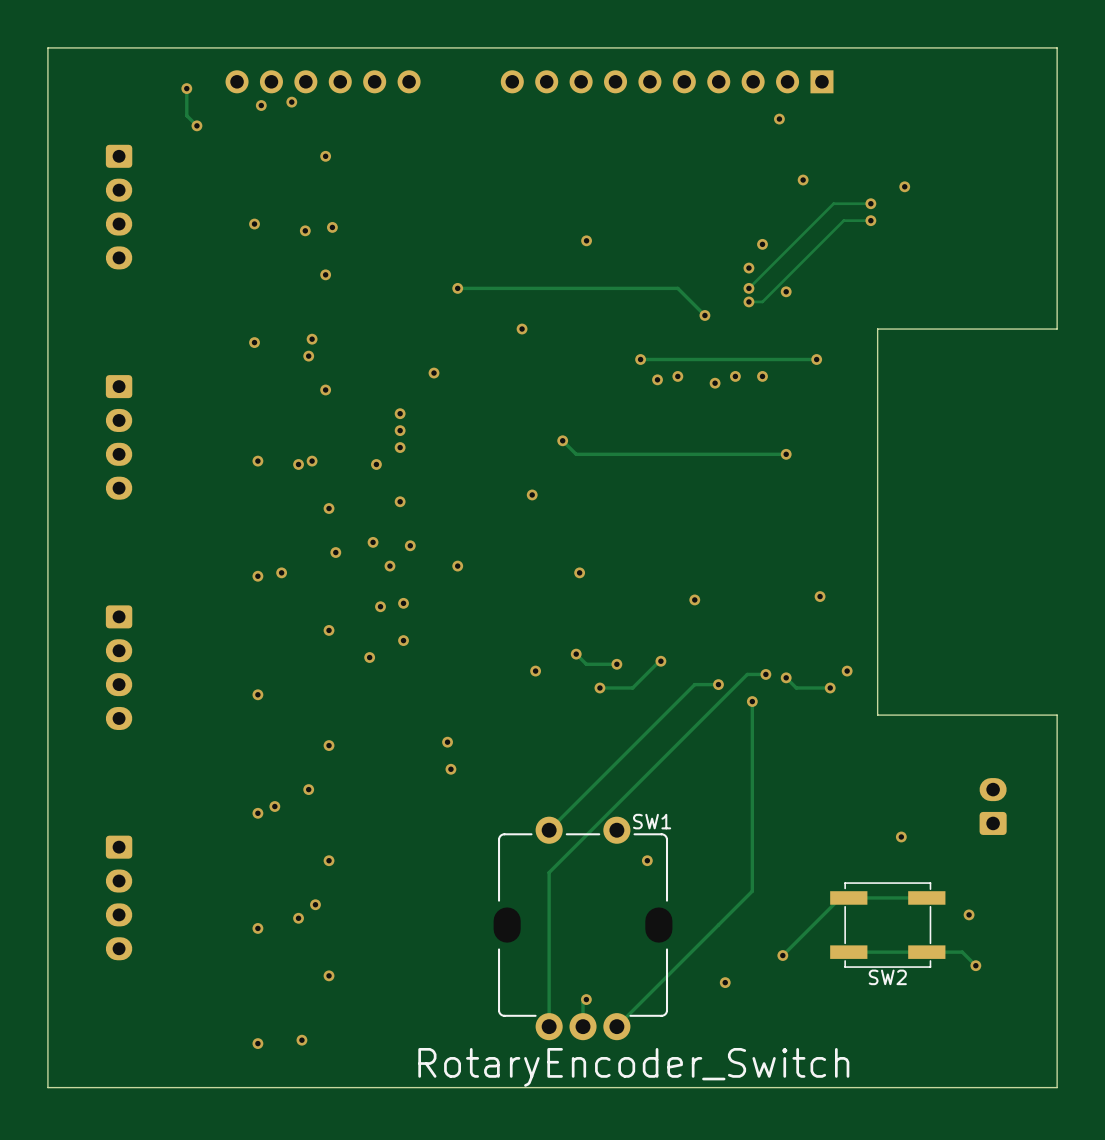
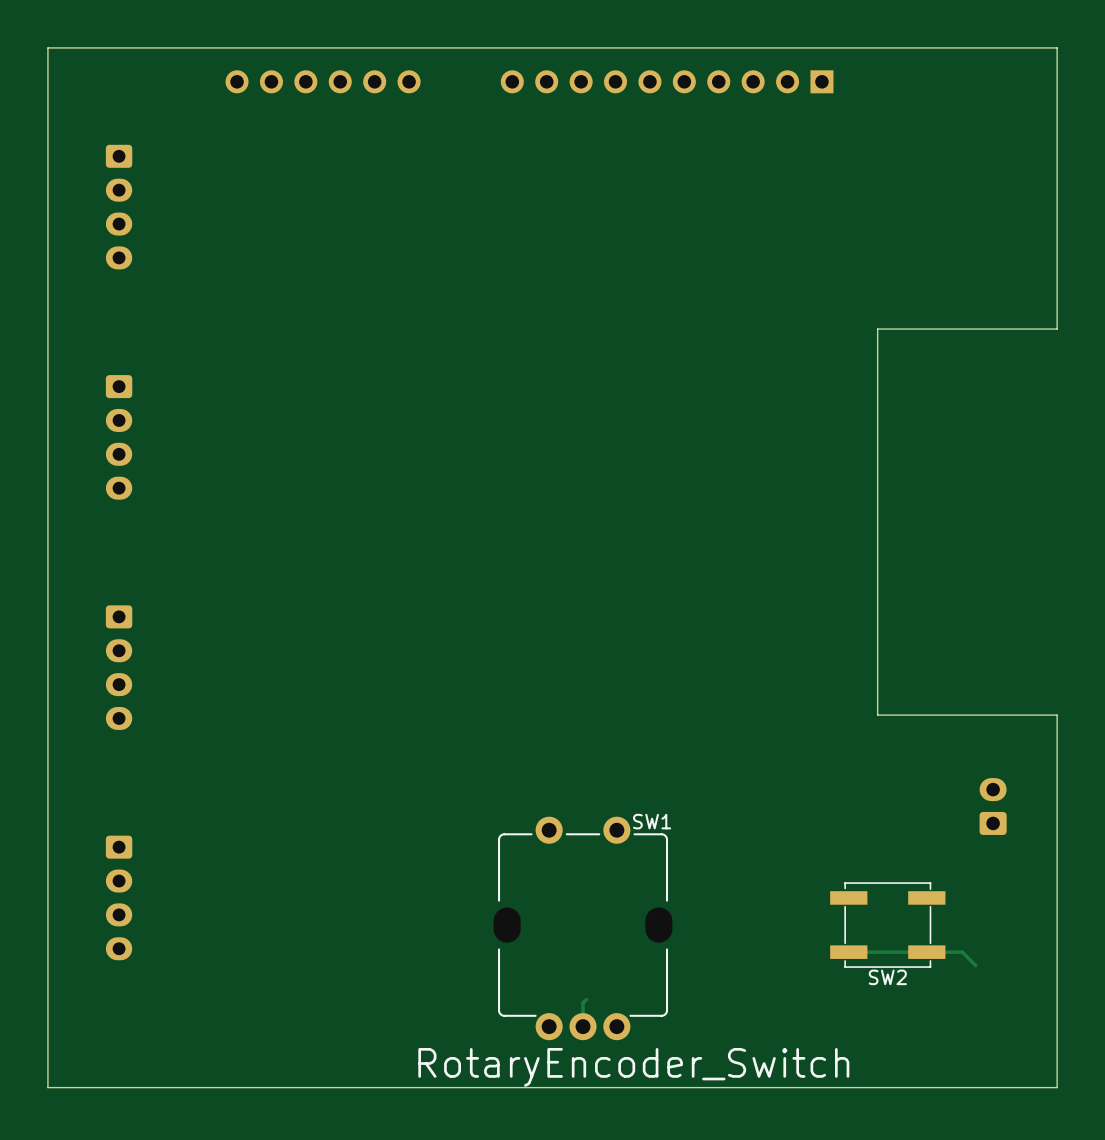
track: (186, 88) (186, 115) (196, 125) -> none
via: (186, 88) -> none
via: (291, 102) -> none
via: (261, 105) -> none
via: (779, 119) -> none
via: (196, 125) -> none
via: (325, 156) -> none
via: (803, 180) -> none
via: (904, 186) -> none
track: (870, 203) (833, 203) (748, 288) -> none
via: (870, 203) -> none
track: (870, 220) (843, 220) (762, 301) (748, 301) -> none
via: (870, 220) -> none
via: (254, 224) -> none
via: (332, 227) -> none
via: (305, 230) -> none
via: (586, 240) -> none
via: (762, 244) -> none
via: (748, 268) -> none
via: (325, 274) -> none
track: (457, 288) (677, 288) (704, 315) -> none
via: (457, 288) -> none
via: (748, 288) -> none
via: (786, 291) -> none
via: (748, 301) -> none
via: (704, 315) -> none
via: (522, 329) -> none
via: (312, 339) -> none
via: (254, 342) -> none
via: (308, 356) -> none
via: (640, 359) -> none
track: (816, 359) (640, 359) -> none
via: (816, 359) -> none
via: (434, 373) -> none
via: (677, 376) -> none
via: (735, 376) -> none
via: (762, 376) -> none
via: (657, 379) -> none
via: (715, 383) -> none
via: (325, 389) -> none
via: (400, 413) -> none
via: (400, 430) -> none
track: (562, 440) (576, 454) (786, 454) -> none
via: (562, 440) -> none
via: (400, 447) -> none
via: (786, 454) -> none
via: (257, 461) -> none
via: (312, 461) -> none
via: (298, 464) -> none
via: (376, 464) -> none
via: (532, 494) -> none
via: (400, 501) -> none
via: (329, 508) -> none
via: (373, 542) -> none
via: (410, 545) -> none
via: (335, 552) -> none
via: (389, 566) -> none
via: (457, 566) -> none
via: (281, 572) -> none
via: (579, 572) -> none
via: (257, 576) -> none
via: (820, 596) -> none
via: (694, 599) -> none
via: (403, 603) -> none
via: (380, 606) -> none
via: (329, 630) -> none
via: (403, 640) -> none
track: (576, 654) (586, 664) (616, 664) -> none
via: (576, 654) -> none
via: (369, 657) -> none
track: (660, 661) (632, 687) (599, 687) -> none
via: (660, 661) -> none
via: (616, 664) -> none
via: (535, 671) -> none
via: (847, 671) -> none
track: (765, 674) (747, 674) (549, 872) (549, 1026) -> none
via: (765, 674) -> none
track: (786, 677) (796, 687) (830, 687) -> none
via: (786, 677) -> none
track: (718, 684) (694, 684) (549, 830) -> none
via: (718, 684) -> none
via: (599, 687) -> none
via: (830, 687) -> none
via: (257, 694) -> none
track: (752, 701) (752, 891) (616, 1026) -> none
via: (752, 701) -> none
via: (447, 742) -> none
via: (329, 745) -> none
via: (450, 769) -> none
via: (308, 789) -> none
via: (274, 806) -> none
via: (257, 813) -> none
via: (901, 837) -> none
via: (329, 860) -> none
via: (647, 860) -> none
track: (926, 897) (840, 897) (782, 955) -> none
via: (315, 904) -> none
via: (969, 914) -> none
via: (298, 918) -> none
via: (257, 928) -> none
via: (782, 955) -> none
via: (975, 965) -> none
via: (329, 975) -> none
via: (725, 982) -> none
via: (586, 999) -> none
via: (301, 1040) -> none
via: (257, 1043) -> none

